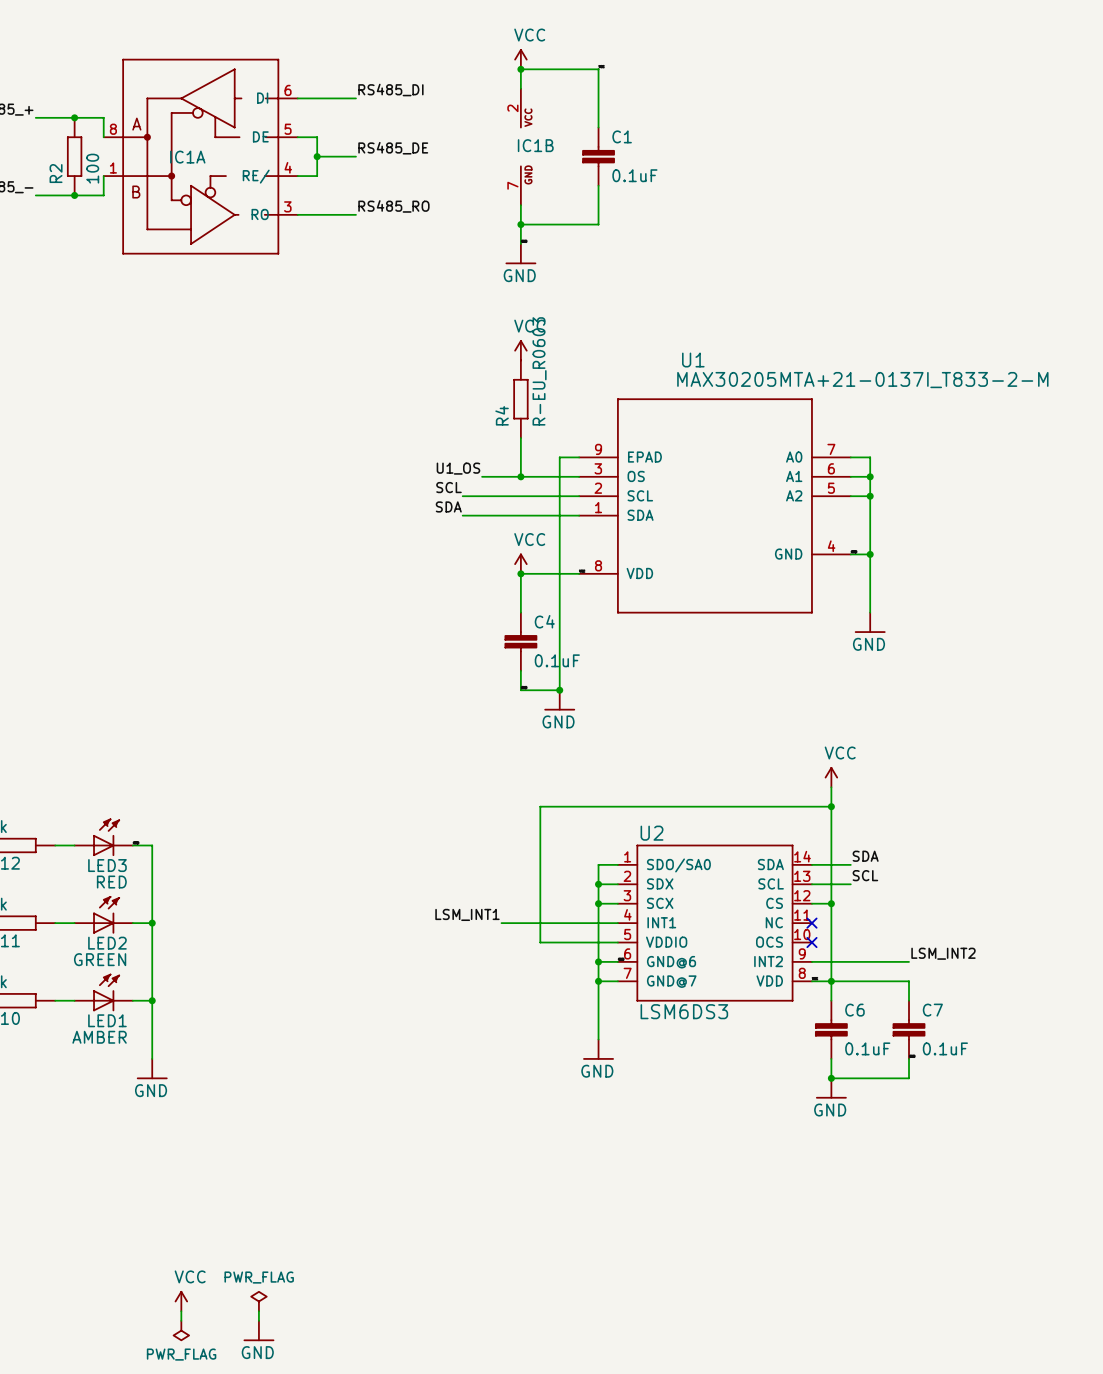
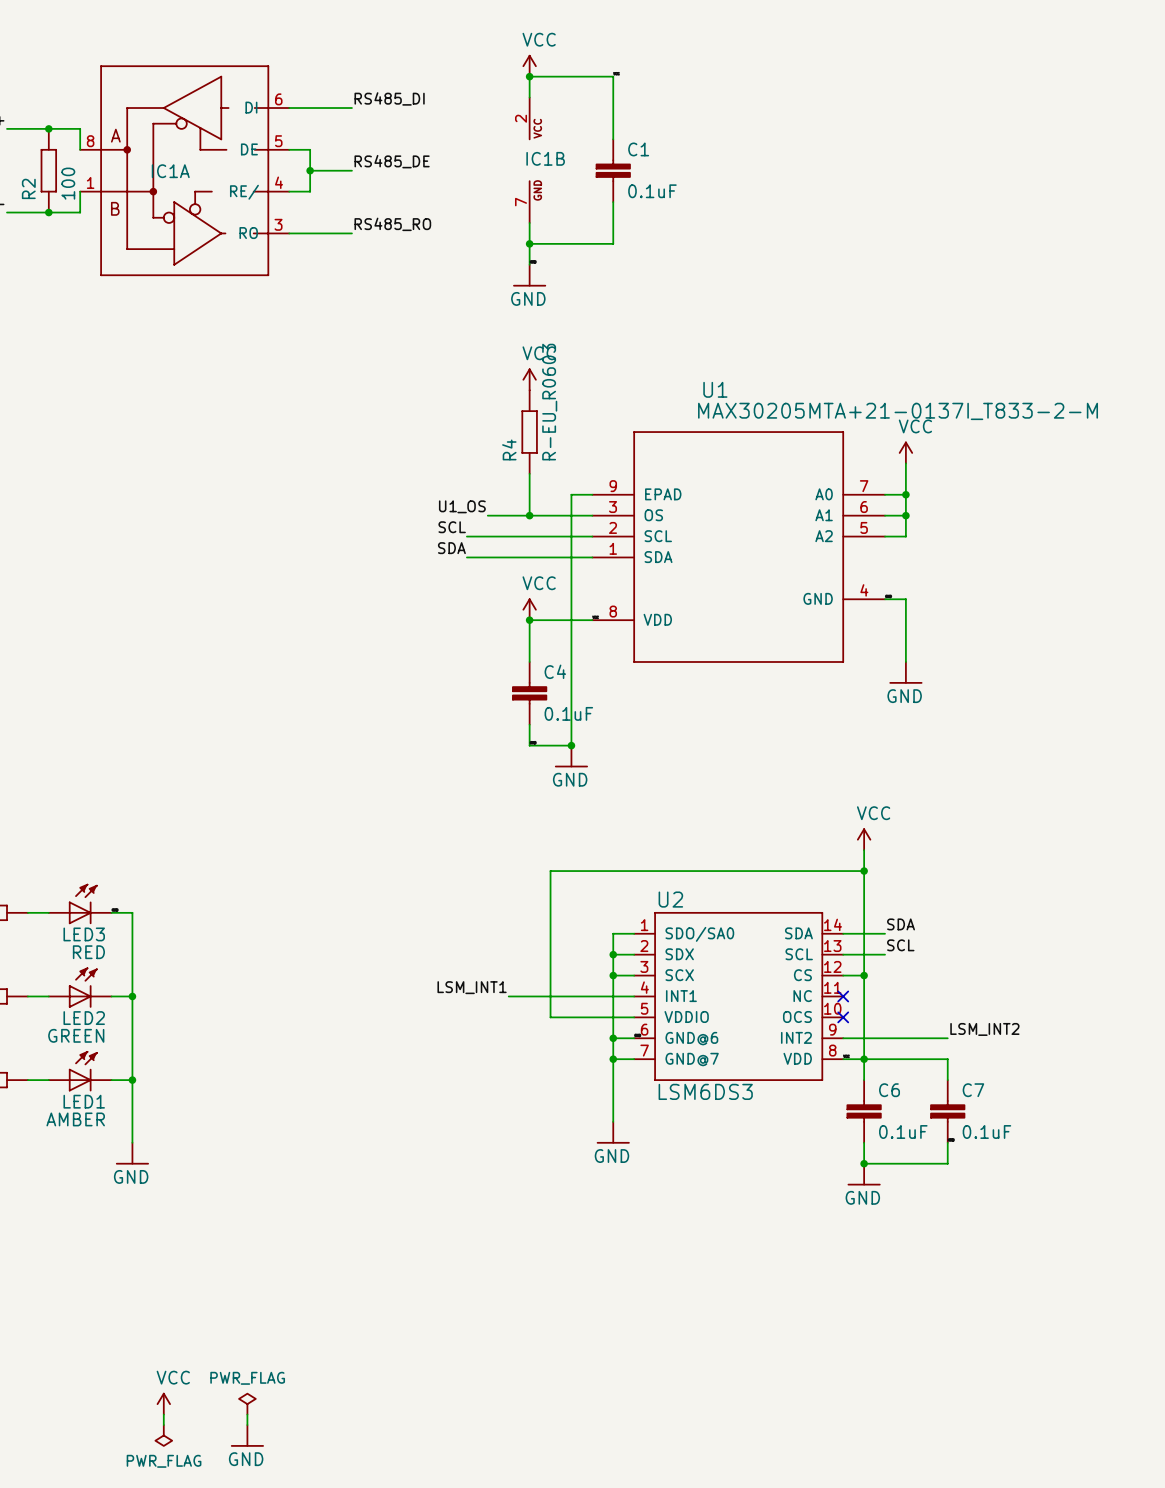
power symbol: none -> VCC (905, 452)
wire: none -> (905, 463) (905, 494)
wire: (870, 496) (870, 554) -> none
junction position: (870, 496) -> (905, 494)
junction: (870, 554) -> none

